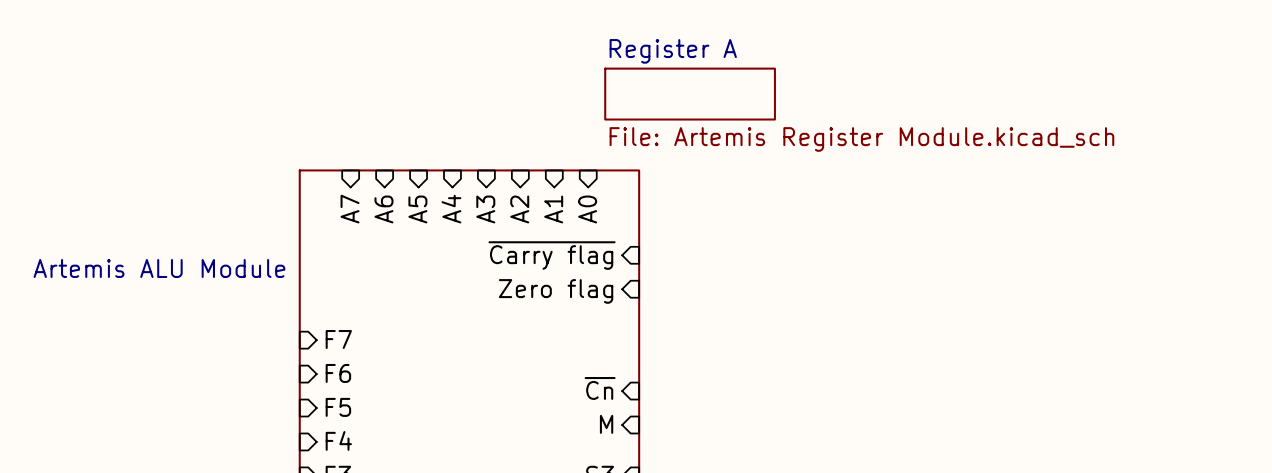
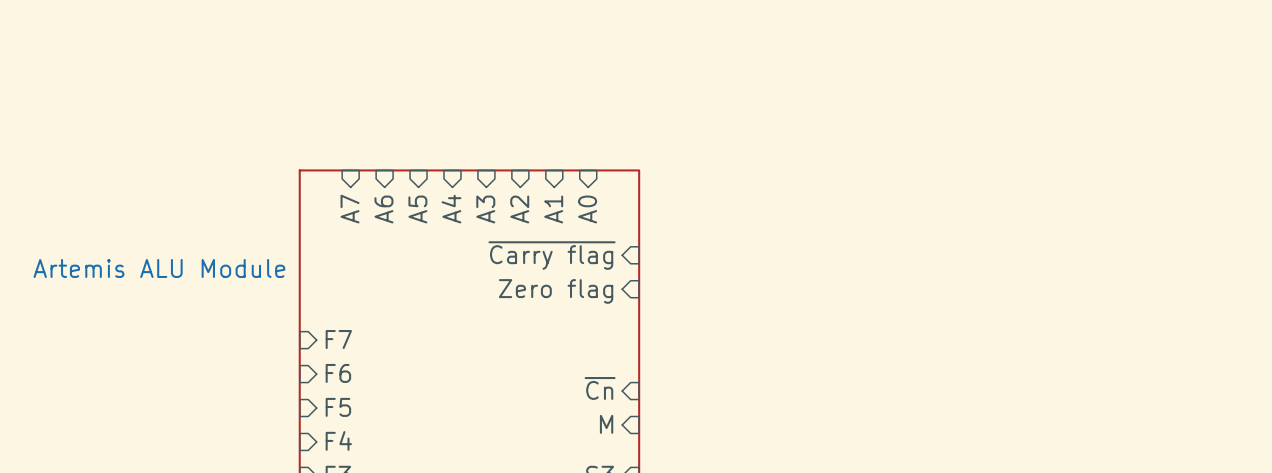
sheet Register A: File: Artemis Register Module.kicad_sch (690, 94) -> none

